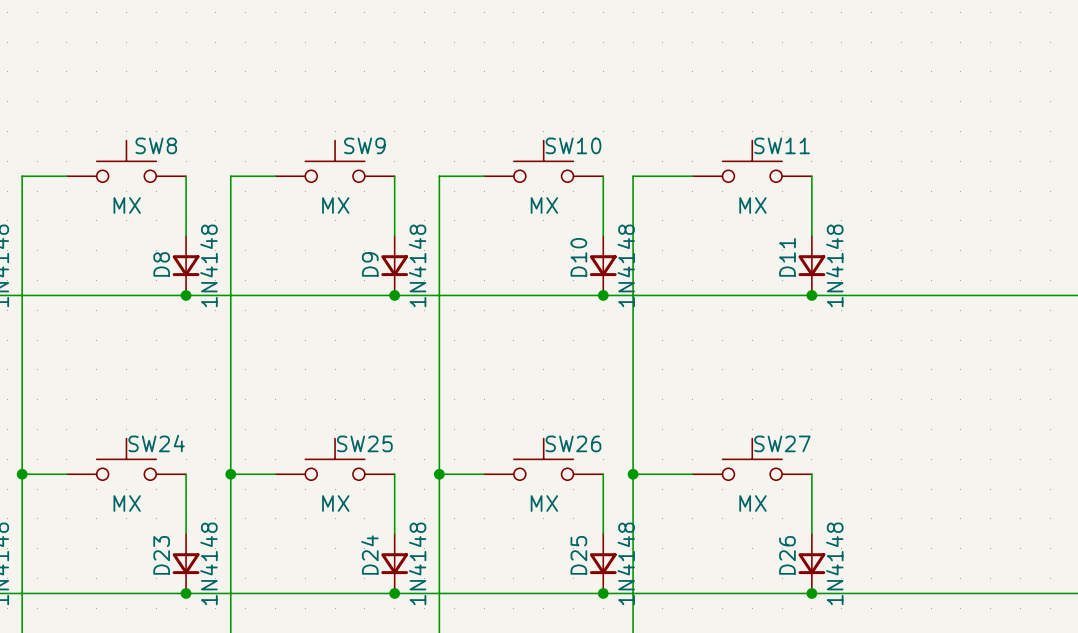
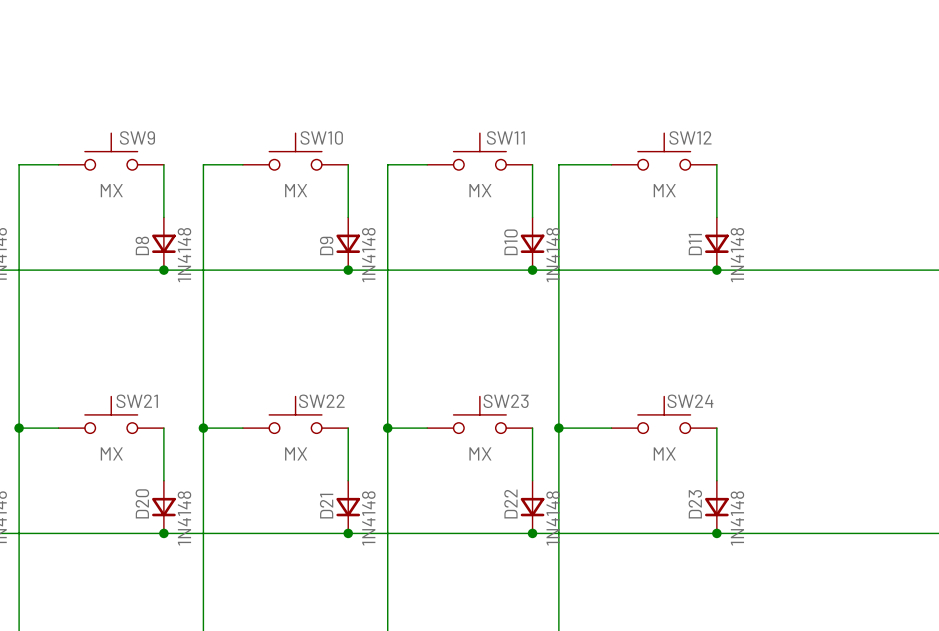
SW8 name: SW8 (156, 145) -> SW9 (137, 137)
SW9 name: SW9 (364, 145) -> SW10 (321, 137)
SW10 name: SW10 (573, 145) -> SW11 (505, 137)
SW11 name: SW11 (782, 145) -> SW12 (690, 137)
SW24 name: SW24 (156, 443) -> SW21 (137, 401)
SW25 name: SW25 (364, 443) -> SW22 (321, 401)
SW26 name: SW26 (573, 443) -> SW23 (506, 401)
SW27 name: SW27 (782, 443) -> SW24 (690, 401)
D23 name: D23 (161, 555) -> D20 (142, 503)
D24 name: D24 (369, 555) -> D21 (326, 506)
D25 name: D25 (578, 555) -> D22 (510, 504)
D26 name: D26 (787, 555) -> D23 (695, 504)

